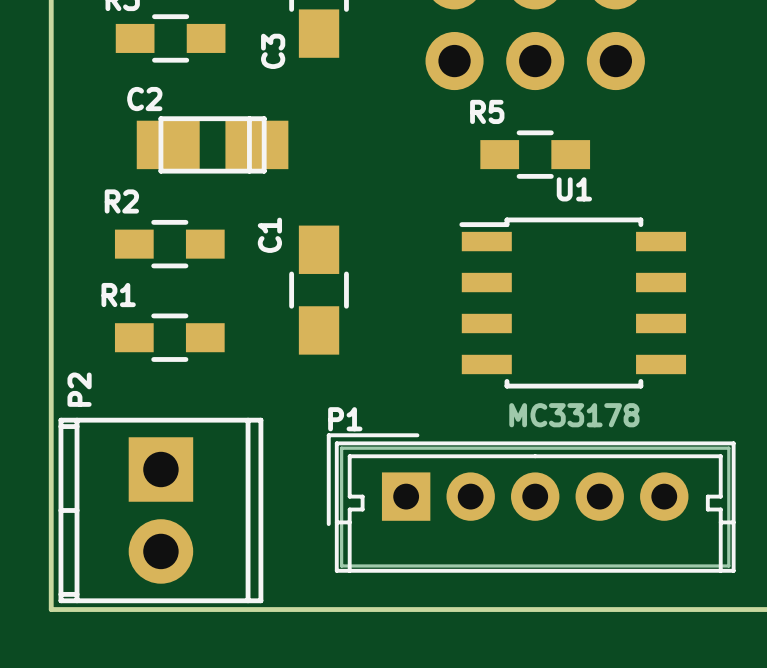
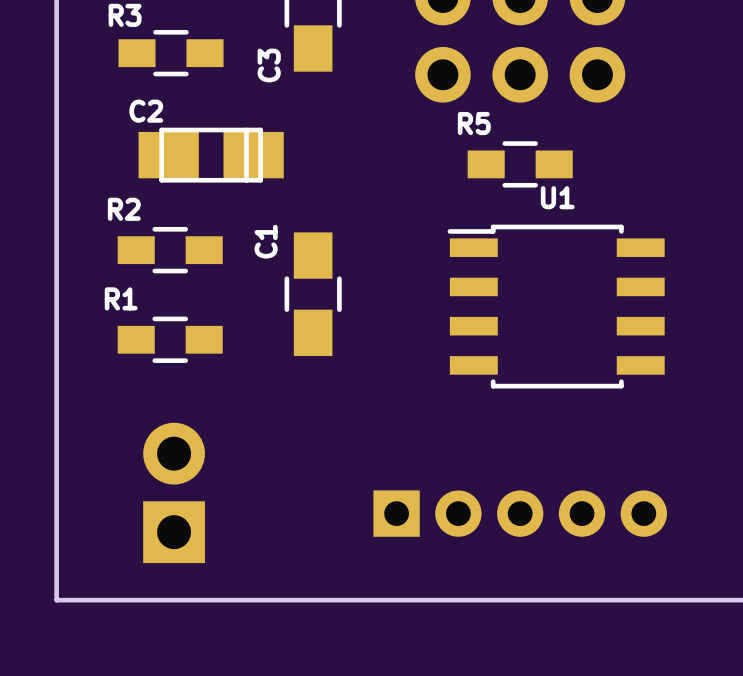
U1 value: MC33178 (574, 415) -> none
P1 side: top (531, 503) -> bottom (520, 513)
P2 side: top (160, 510) -> bottom (174, 492)

